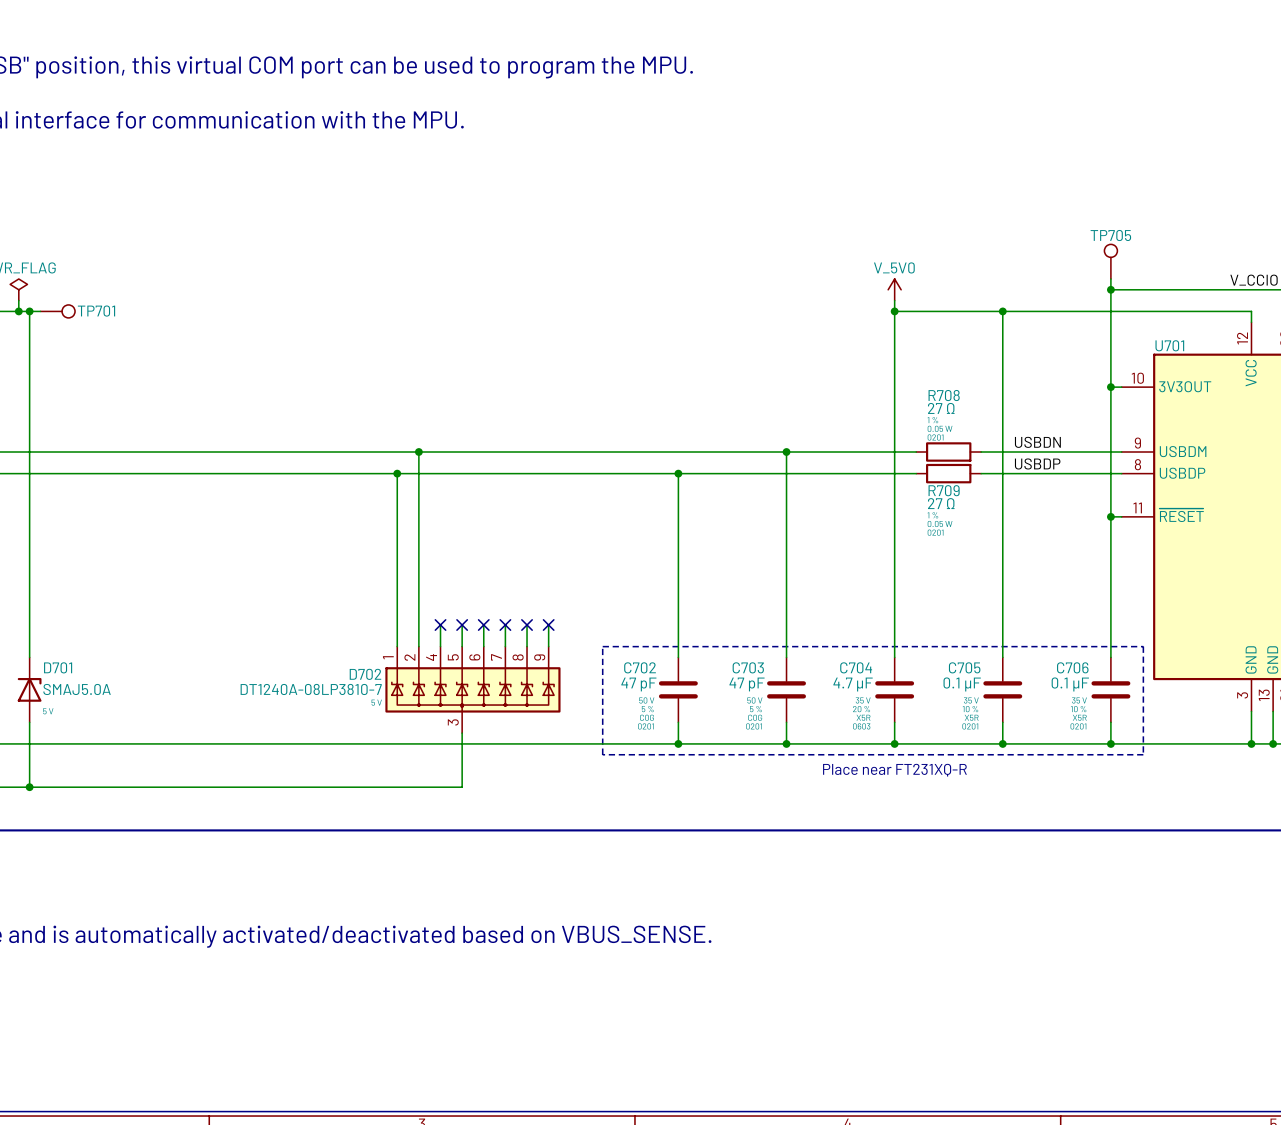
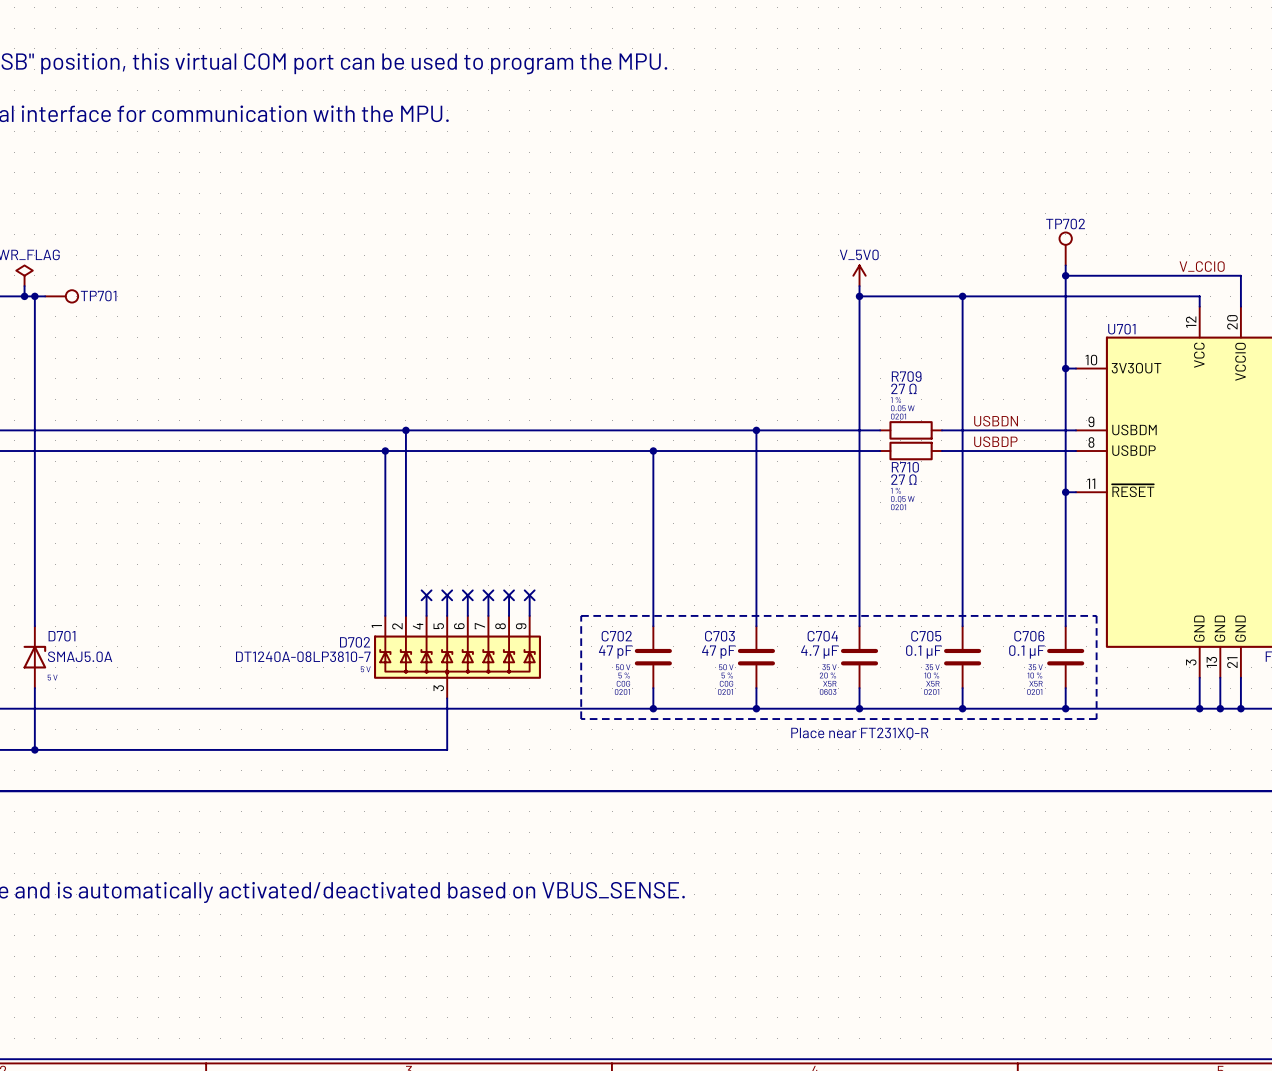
TP705 name: TP705 (1110, 235) -> TP702 (1065, 223)
R708 name: R708 (944, 395) -> R709 (906, 376)
R709 name: R709 (944, 490) -> R710 (905, 467)

